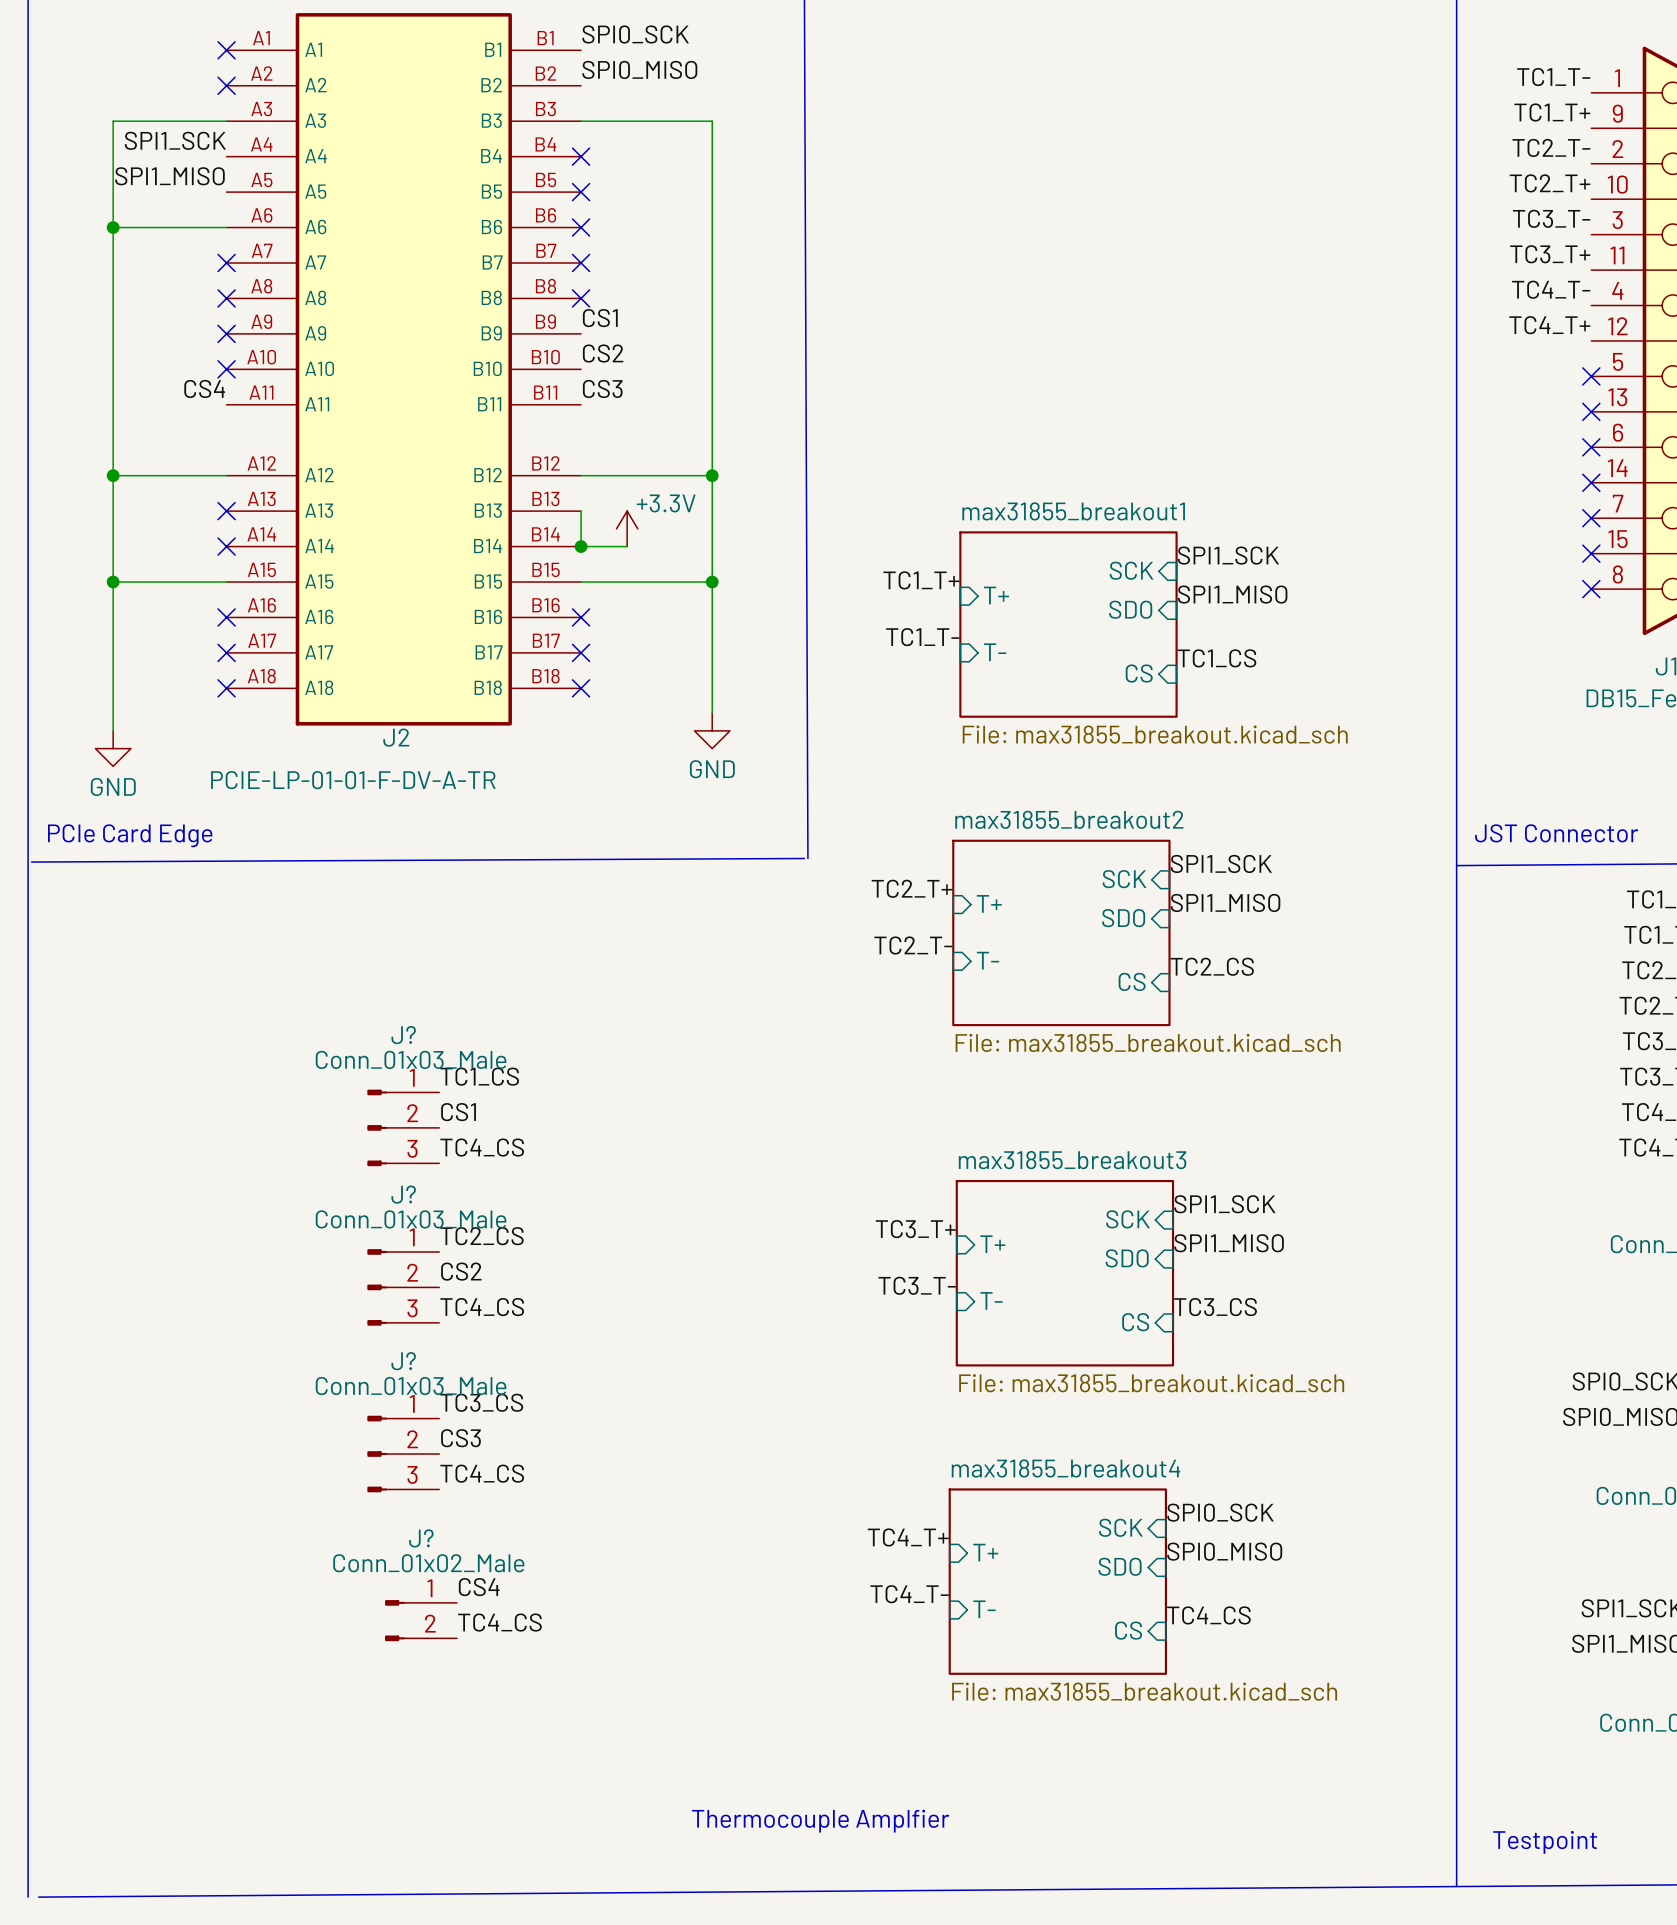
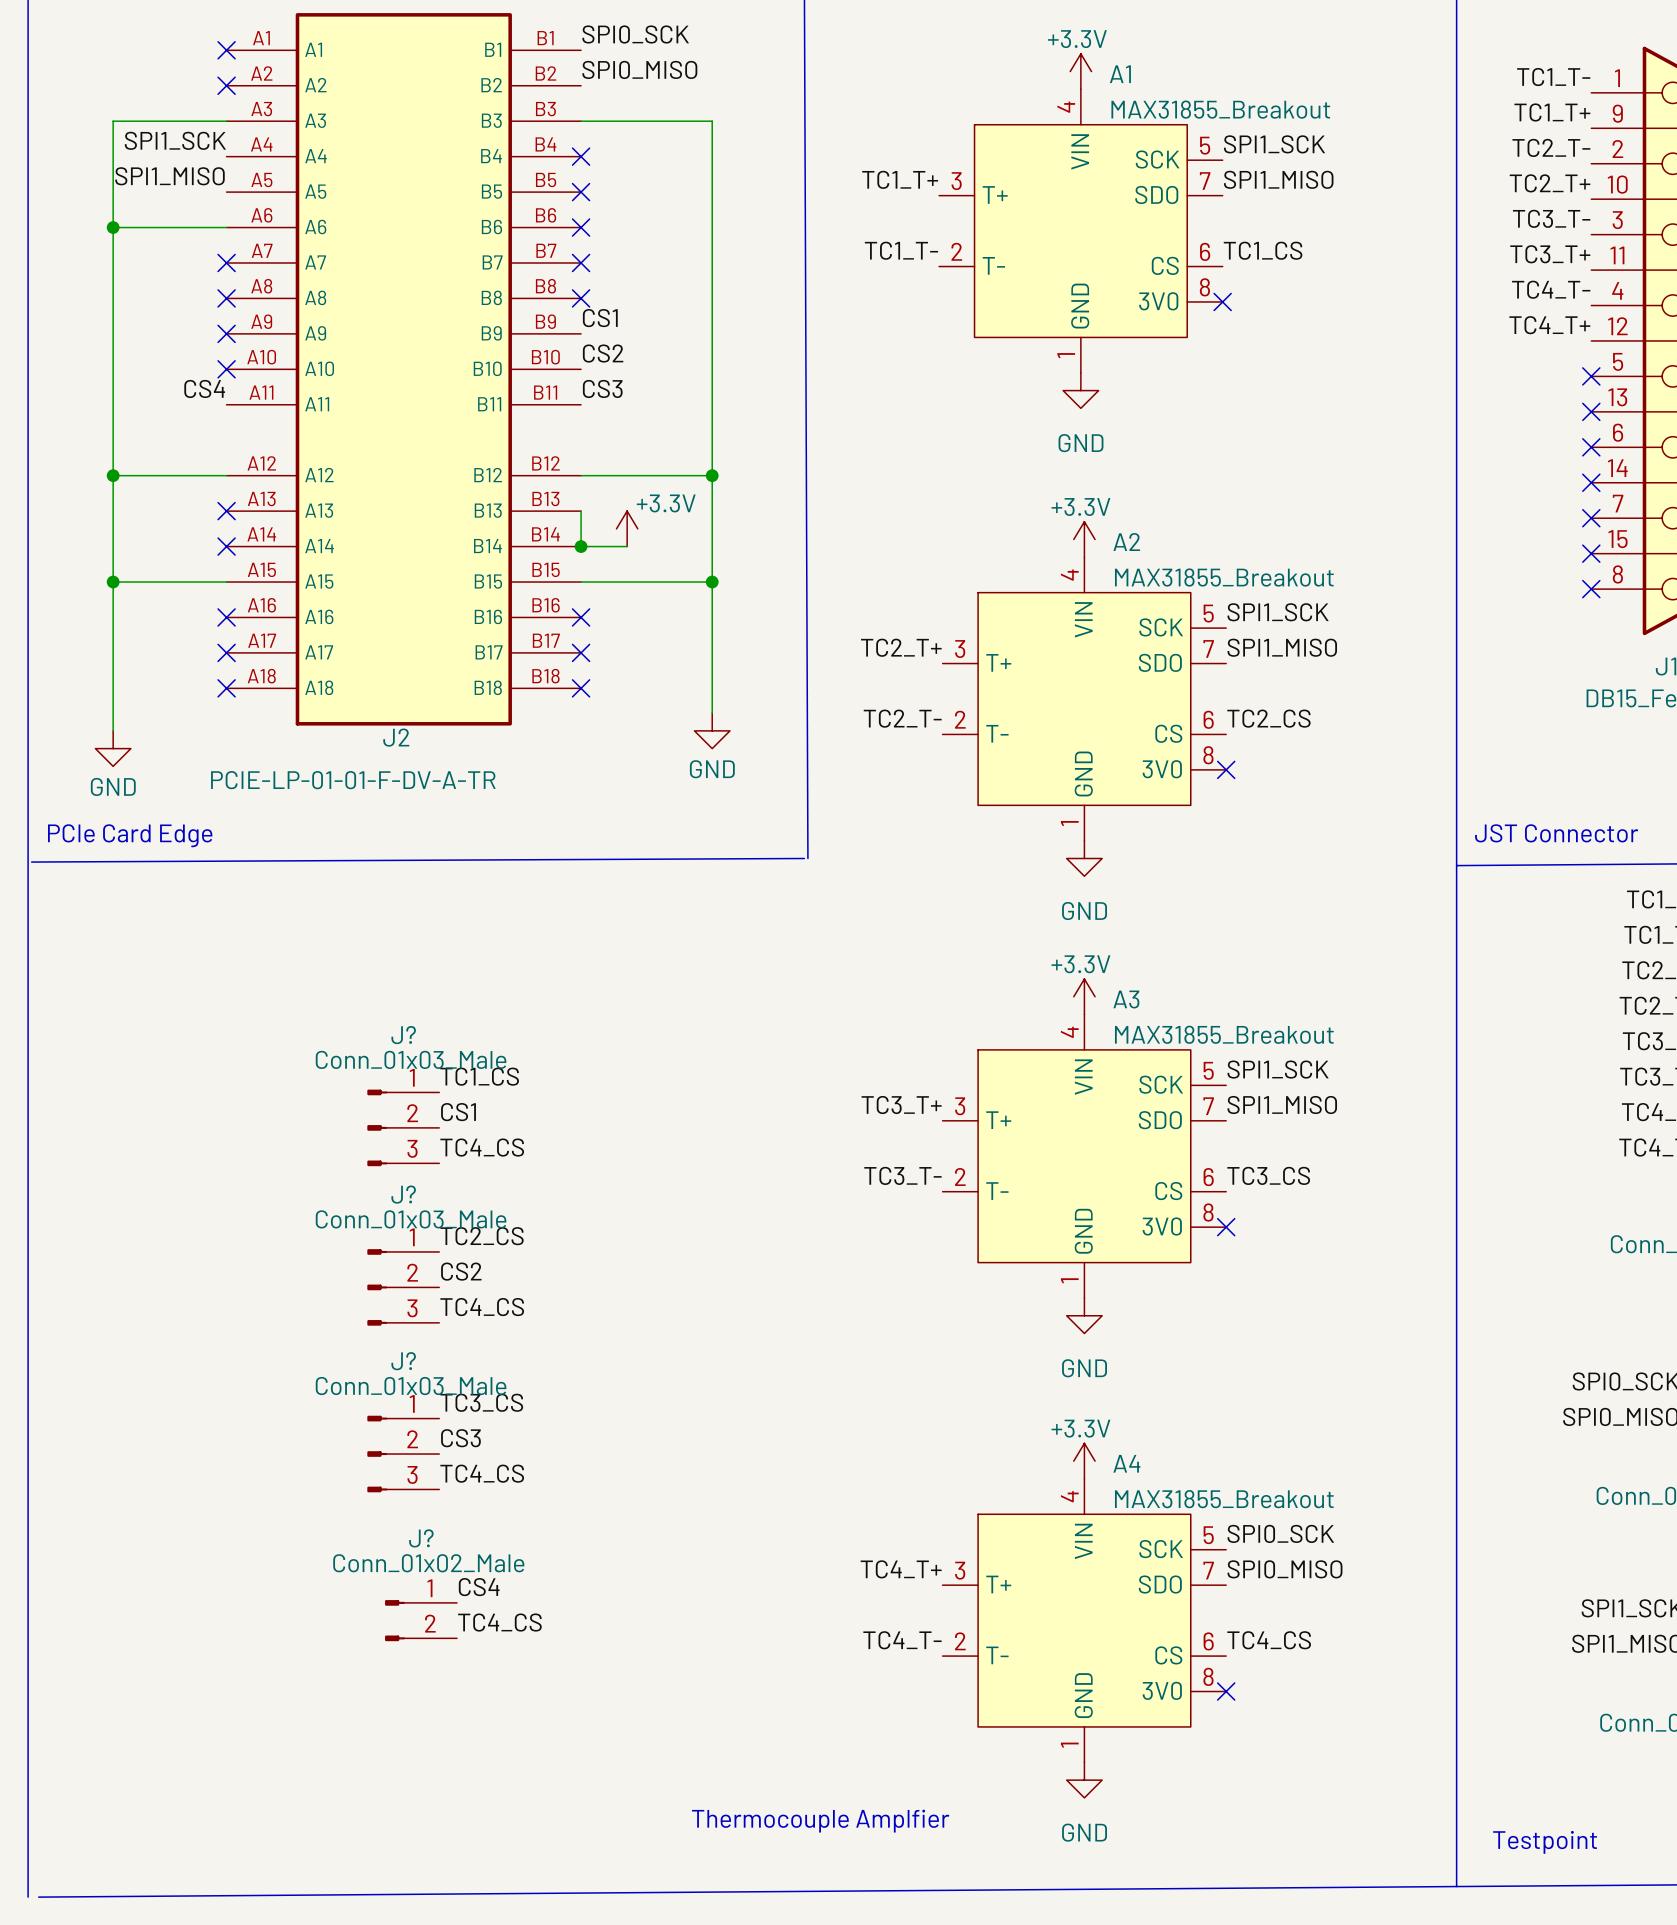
power symbol: none -> +3.3V (1080, 71)
label: none -> SPI1_SCK (1274, 144)
label: none -> TC1_T+ (900, 179)
label: none -> SPI1_MISO (1278, 179)
A1: none -> MAX31855_Breakout (1080, 231)
label: none -> TC1_T- (901, 250)
label: none -> TC1_CS (1263, 250)
no-connect mark: none -> (1222, 301)
power symbol: none -> GND (1080, 390)
power symbol: none -> +3.3V (1084, 539)
label position: SPI1_SCK (1228, 555) -> SPI1_SCK (1278, 612)
sheet pin: SCK (1131, 570) -> none
label: TC1_T+ (921, 580) -> none
label position: SPI1_MISO (1232, 594) -> SPI1_MISO (1282, 647)
sheet pin: T+ (996, 595) -> none
sheet pin: SDO (1130, 609) -> none
sheet max31855_breakout1: File: max31855_breakout.kicad_sch (1068, 624) -> none
label: TC1_T- (922, 637) -> none
sheet pin: T- (995, 652) -> none
label: TC1_CS (1216, 658) -> none
sheet pin: CS (1139, 673) -> none
A2: none -> MAX31855_Breakout (1084, 698)
no-connect mark: none -> (1226, 769)
power symbol: none -> GND (1084, 858)
label: SPI1_SCK (1221, 863) -> none
sheet pin: SCK (1124, 879) -> none
label position: TC2_T+ (911, 888) -> TC2_T+ (901, 647)
label: SPI1_MISO (1225, 902) -> none
sheet pin: T+ (989, 903) -> none
sheet pin: SDO (1123, 918) -> none
sheet max31855_breakout2: File: max31855_breakout.kicad_sch (1061, 932) -> none
label position: TC2_T- (913, 945) -> TC2_T- (902, 718)
sheet pin: T- (988, 960) -> none
label position: TC2_CS (1212, 966) -> TC2_CS (1268, 718)
sheet pin: CS (1132, 981) -> none
power symbol: none -> +3.3V (1084, 996)
label: none -> SPI1_SCK (1278, 1069)
label: none -> SPI1_MISO (1282, 1105)
A3: none -> MAX31855_Breakout (1084, 1156)
label: SPI1_SCK (1224, 1204) -> none
sheet pin: SCK (1128, 1219) -> none
no-connect mark: none -> (1226, 1227)
label position: TC3_T+ (915, 1229) -> TC3_T+ (901, 1105)
label: SPI1_MISO (1229, 1243) -> none
sheet pin: T+ (992, 1244) -> none
sheet pin: SDO (1127, 1258) -> none
sheet max31855_breakout3: File: max31855_breakout.kicad_sch (1064, 1273) -> none
label position: TC3_T- (917, 1285) -> TC3_T- (902, 1175)
sheet pin: T- (991, 1300) -> none
label position: TC3_CS (1215, 1307) -> TC3_CS (1268, 1175)
power symbol: none -> GND (1084, 1315)
sheet pin: CS (1135, 1322) -> none
power symbol: none -> +3.3V (1084, 1461)
label position: SPI0_SCK (1220, 1512) -> SPI0_SCK (1280, 1533)
sheet pin: SCK (1120, 1527) -> none
label position: TC4_T+ (908, 1537) -> TC4_T+ (901, 1569)
label position: SPI0_MISO (1224, 1551) -> SPI0_MISO (1284, 1569)
sheet pin: T+ (985, 1552) -> none
sheet pin: SDO (1120, 1566) -> none
sheet max31855_breakout4: File: max31855_breakout.kicad_sch (1057, 1581) -> none
label position: TC4_T- (909, 1594) -> TC4_T- (902, 1640)
sheet pin: T- (984, 1609) -> none
label position: TC4_CS (1208, 1615) -> TC4_CS (1269, 1640)
A4: none -> MAX31855_Breakout (1084, 1620)
sheet pin: CS (1128, 1630) -> none
no-connect mark: none -> (1226, 1691)
power symbol: none -> GND (1084, 1780)

